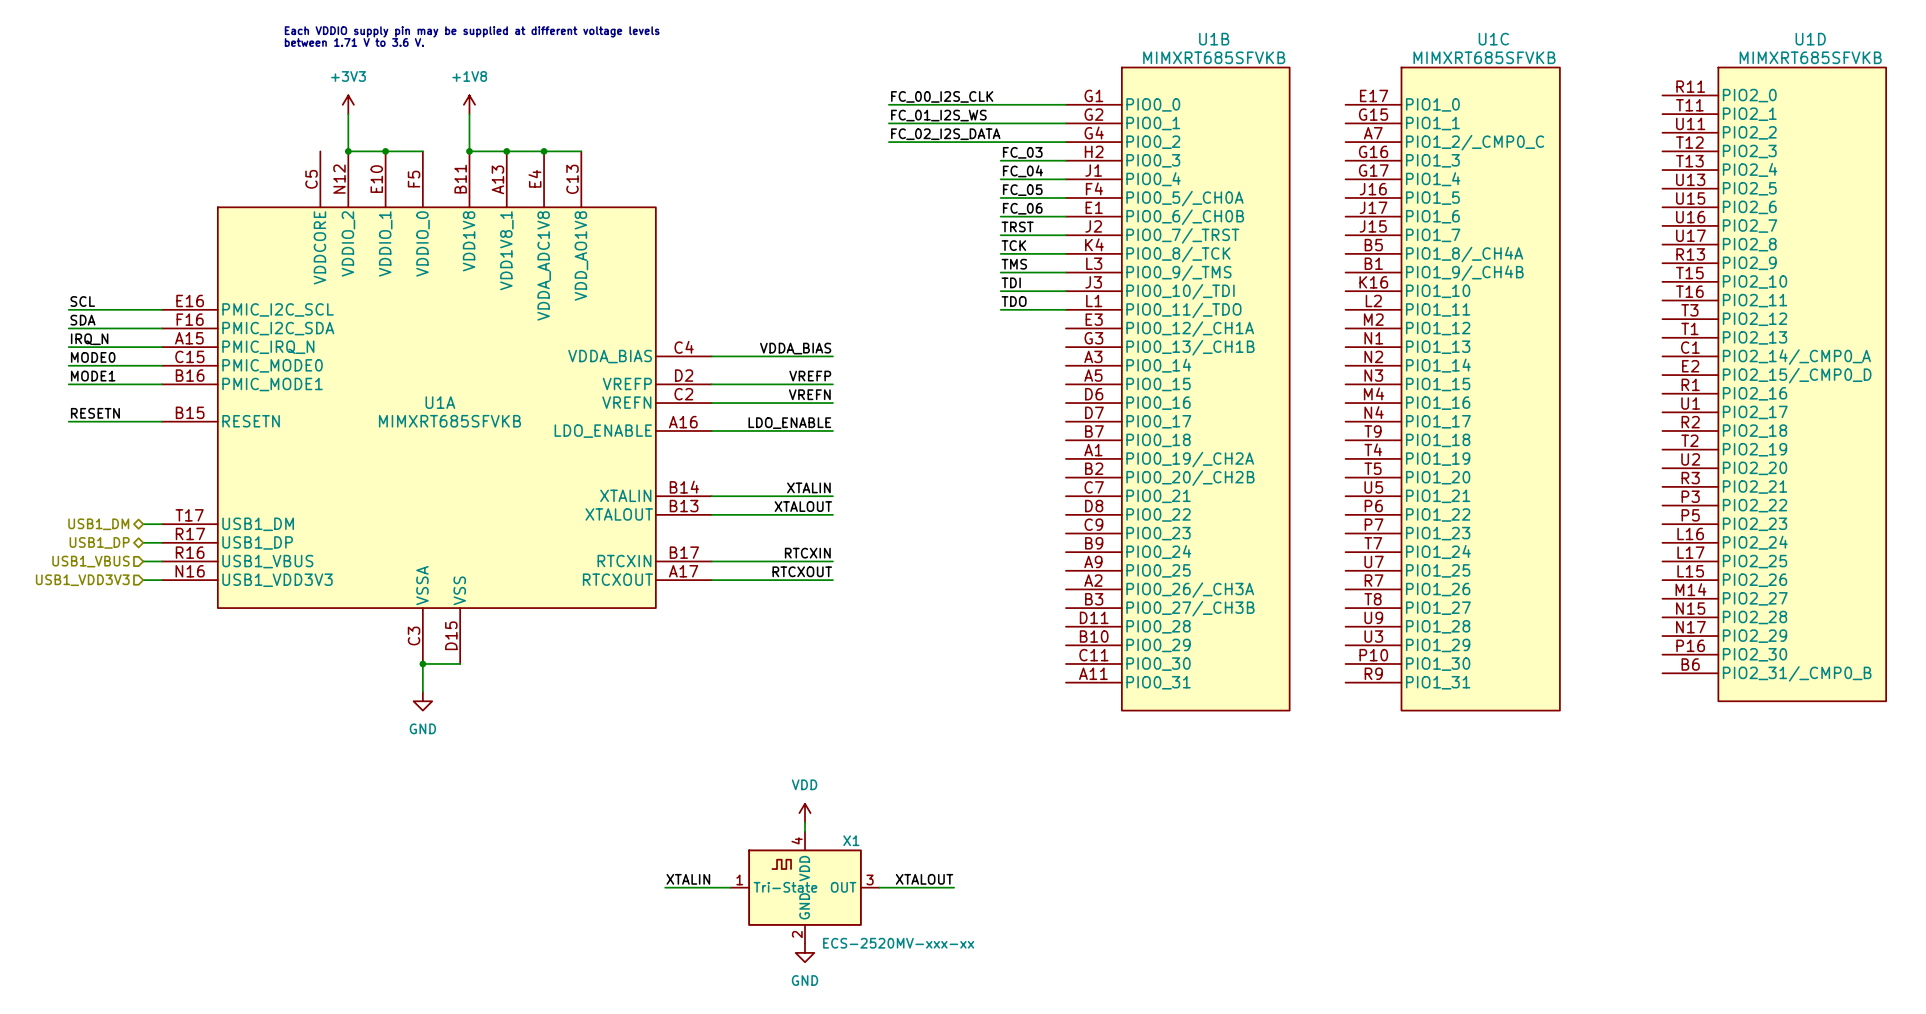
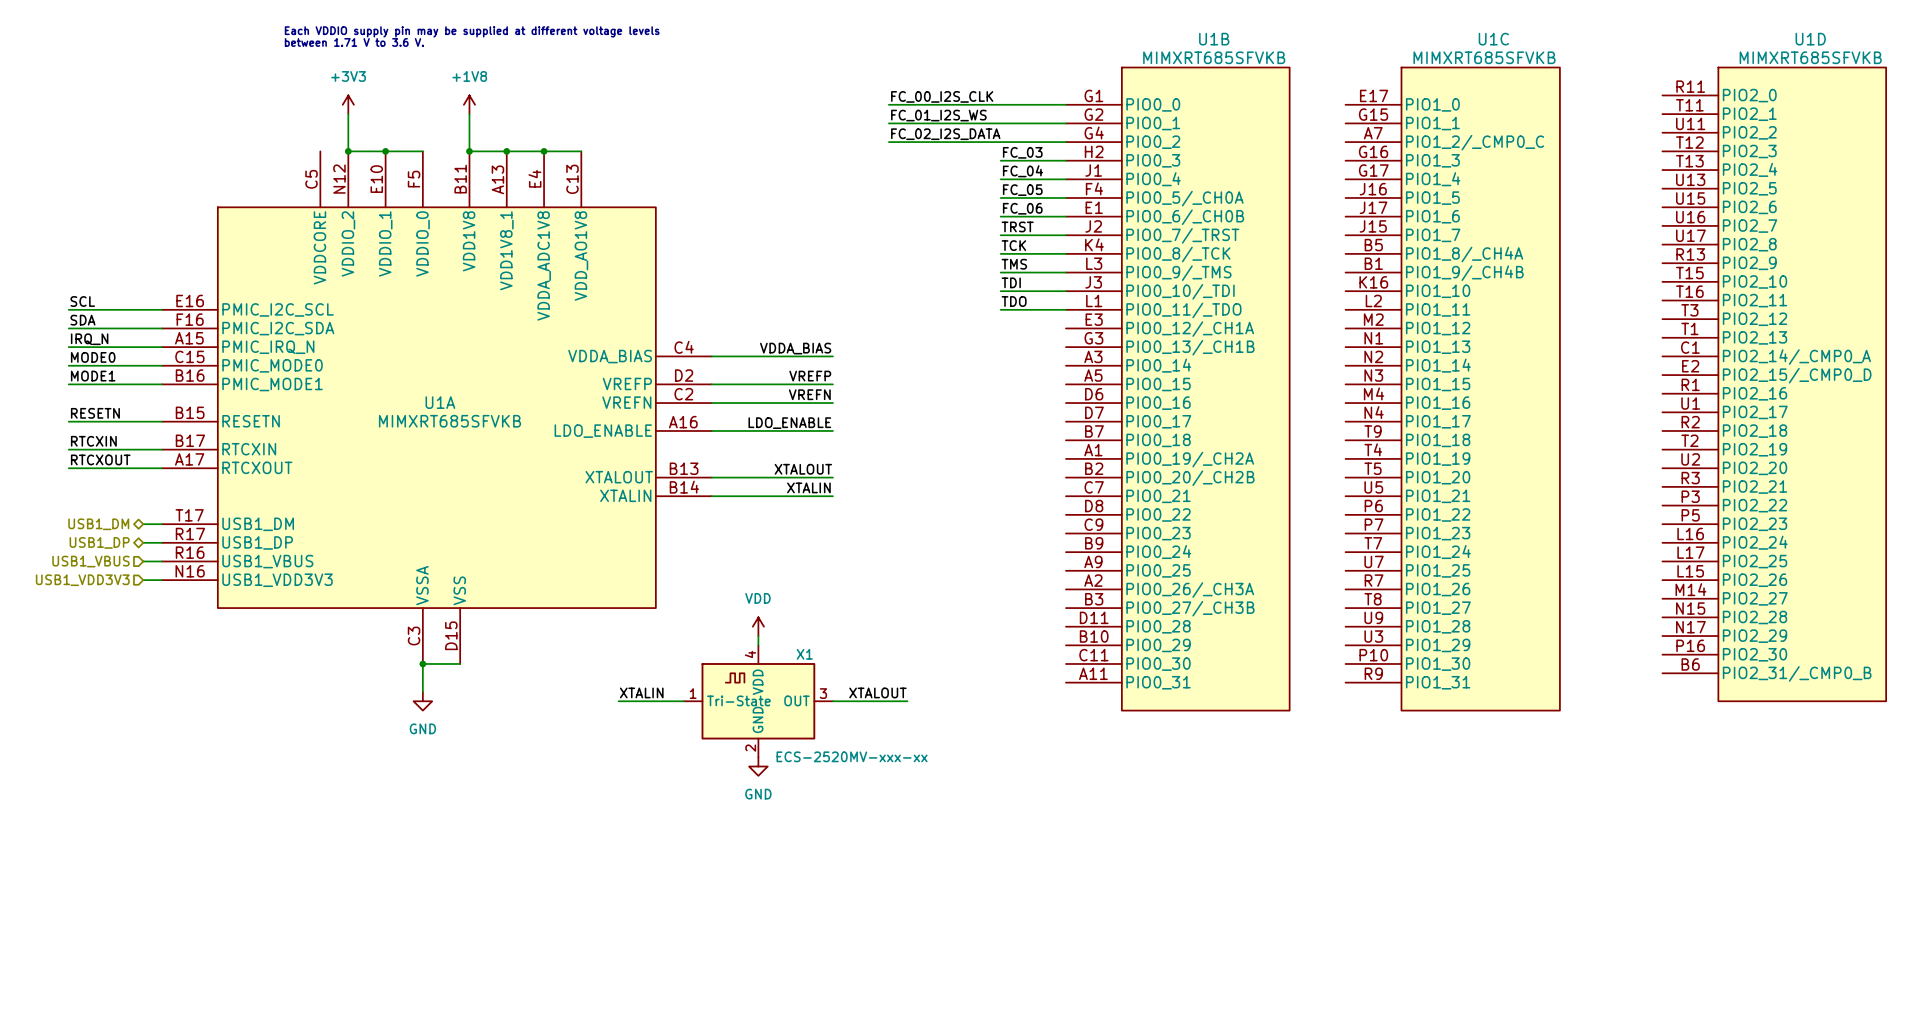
U1A symbol: [161, 151, 712, 664] -> [161, 151, 712, 664]
label: none -> RTCXIN (93, 441)
wire: none -> (68, 449) (161, 449)
label: none -> RTCXOUT (100, 459)
wire: none -> (68, 468) (161, 468)
label position: XTALOUT (803, 506) -> XTALOUT (803, 469)
wire: (711, 514) (832, 514) -> (711, 477) (832, 477)
label: RTCXIN (807, 553) -> none
wire: (711, 561) (832, 561) -> none
label: RTCXOUT (802, 571) -> none
wire: (711, 580) (832, 580) -> none
power symbol: none -> VDD (758, 626)
wire: none -> (758, 636) (758, 645)
label: none -> XTALIN (641, 692)
label: none -> XTALOUT (877, 692)
wire: none -> (618, 701) (683, 701)
wire: none -> (832, 701) (907, 701)
power symbol: none -> GND (758, 766)
power symbol: VDD (805, 813) -> none
wire: (805, 822) (805, 831) -> none
label: XTALIN (688, 879) -> none
label: XTALOUT (924, 879) -> none
wire: (665, 887) (730, 887) -> none
X1 position: (805, 887) -> (758, 701)
wire: (879, 887) (954, 887) -> none
power symbol: GND (805, 952) -> none

